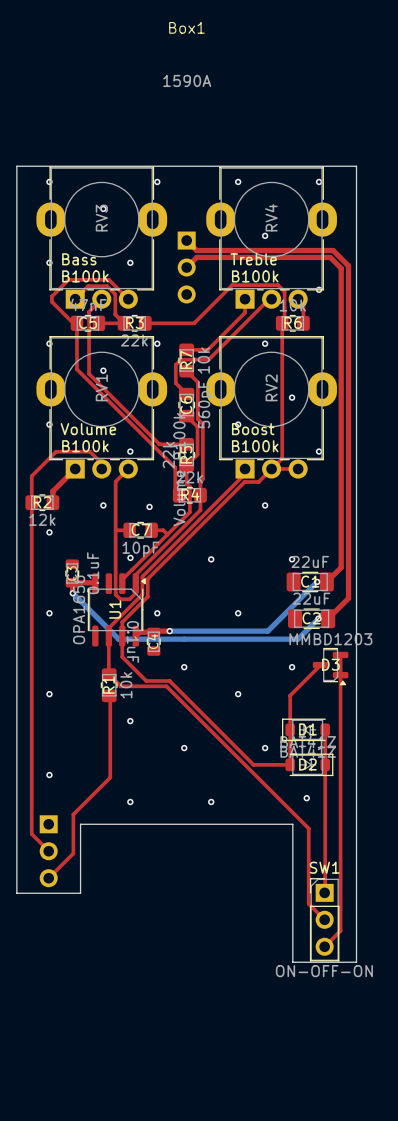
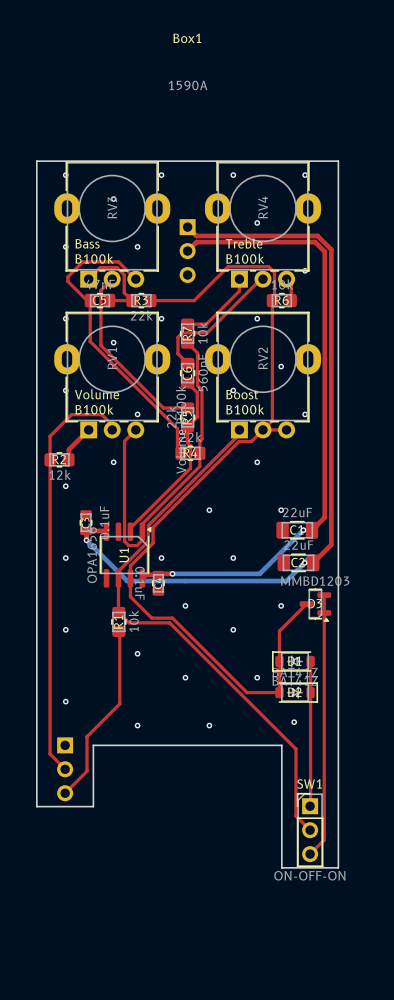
via: (149, 506) -> none
top track: (115, 530) (129, 530) -> none
C7: 10pF (140, 530) -> none
top track: (151, 530) (163, 530) (167, 534) -> none
via: (130, 557) -> none

